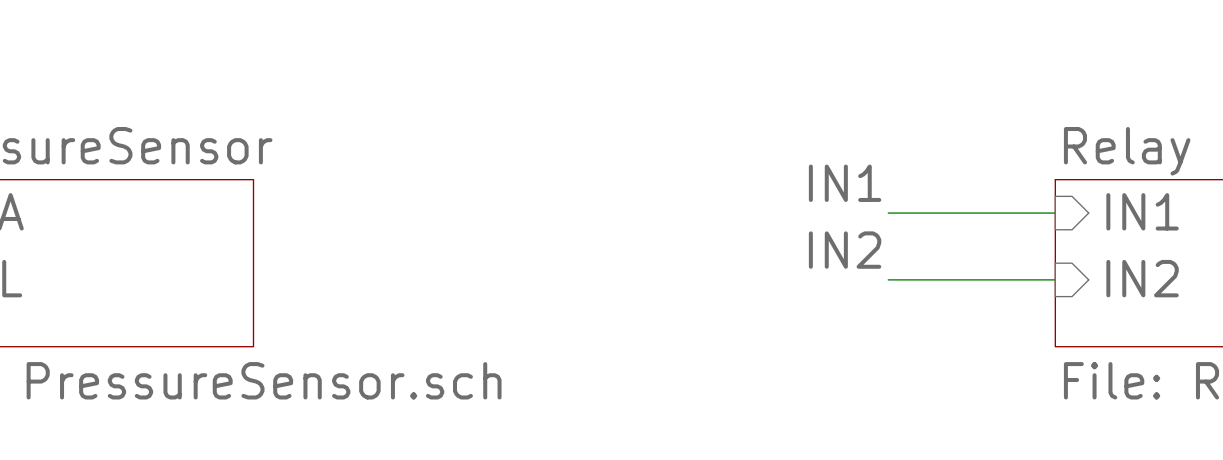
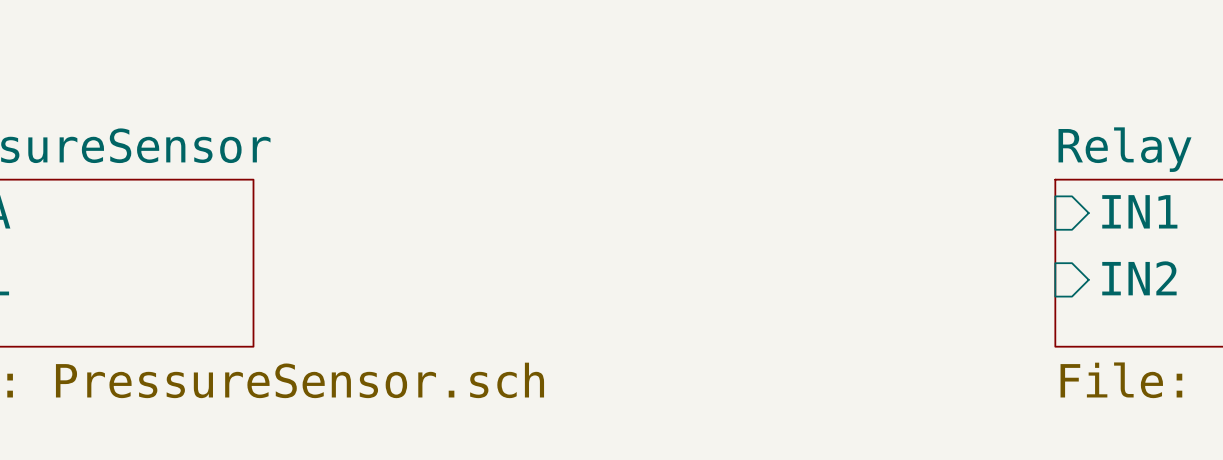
label: IN1 (845, 183) -> none
wire: (888, 213) (1055, 213) -> none
label: IN2 (845, 250) -> none
wire: (888, 279) (1055, 279) -> none

